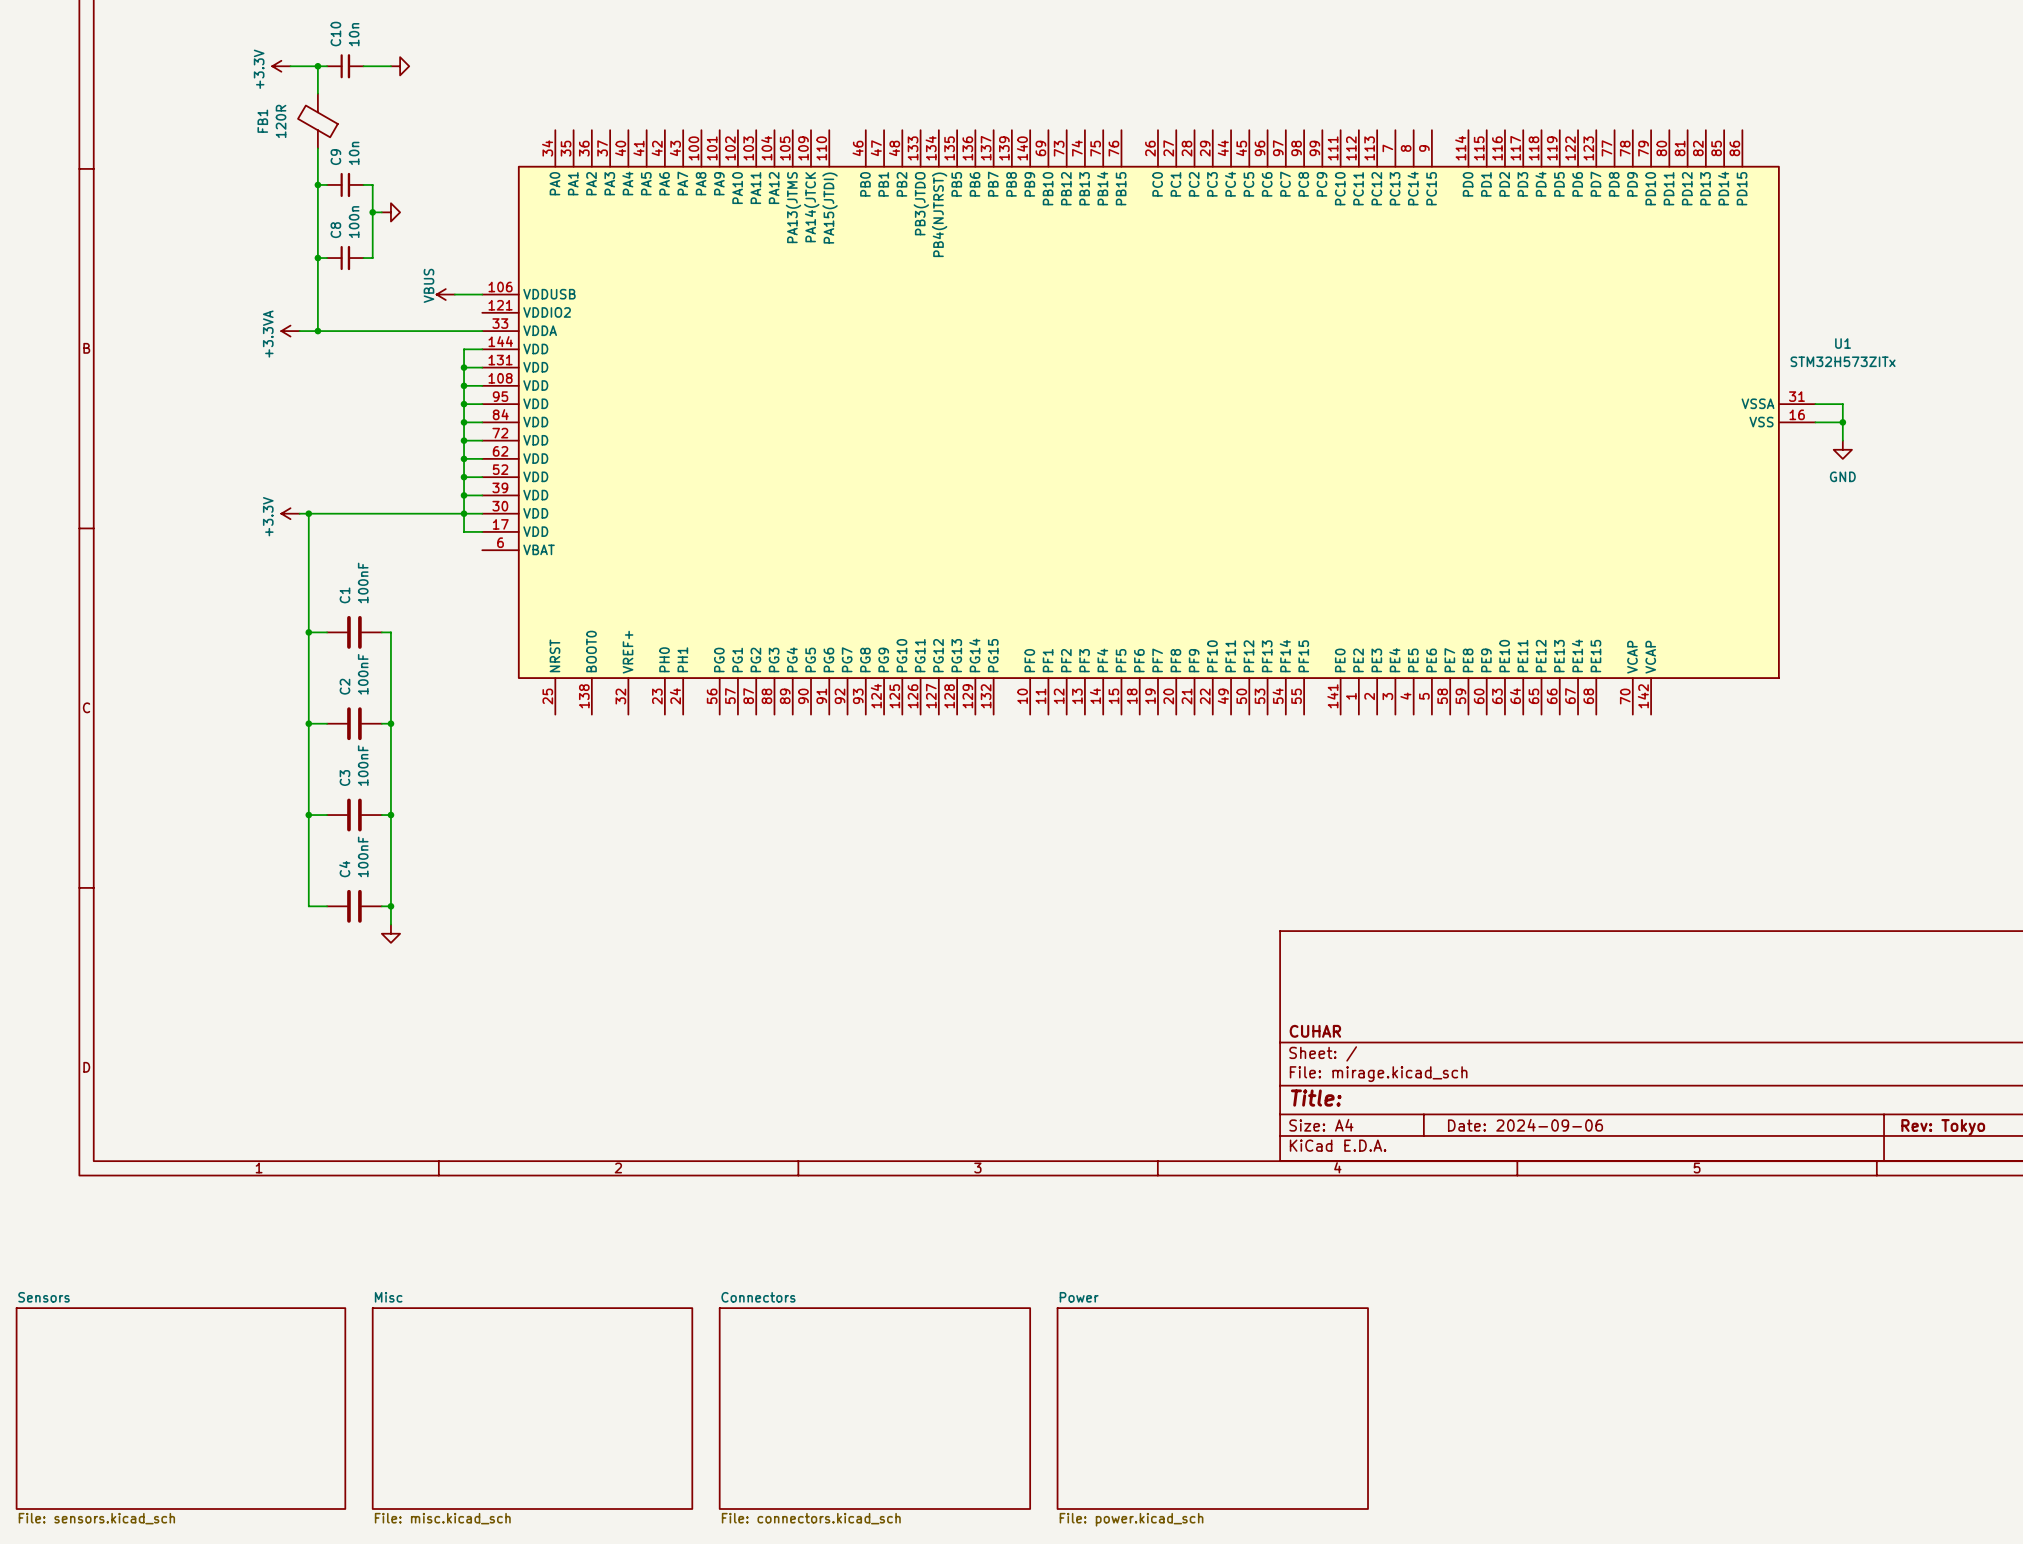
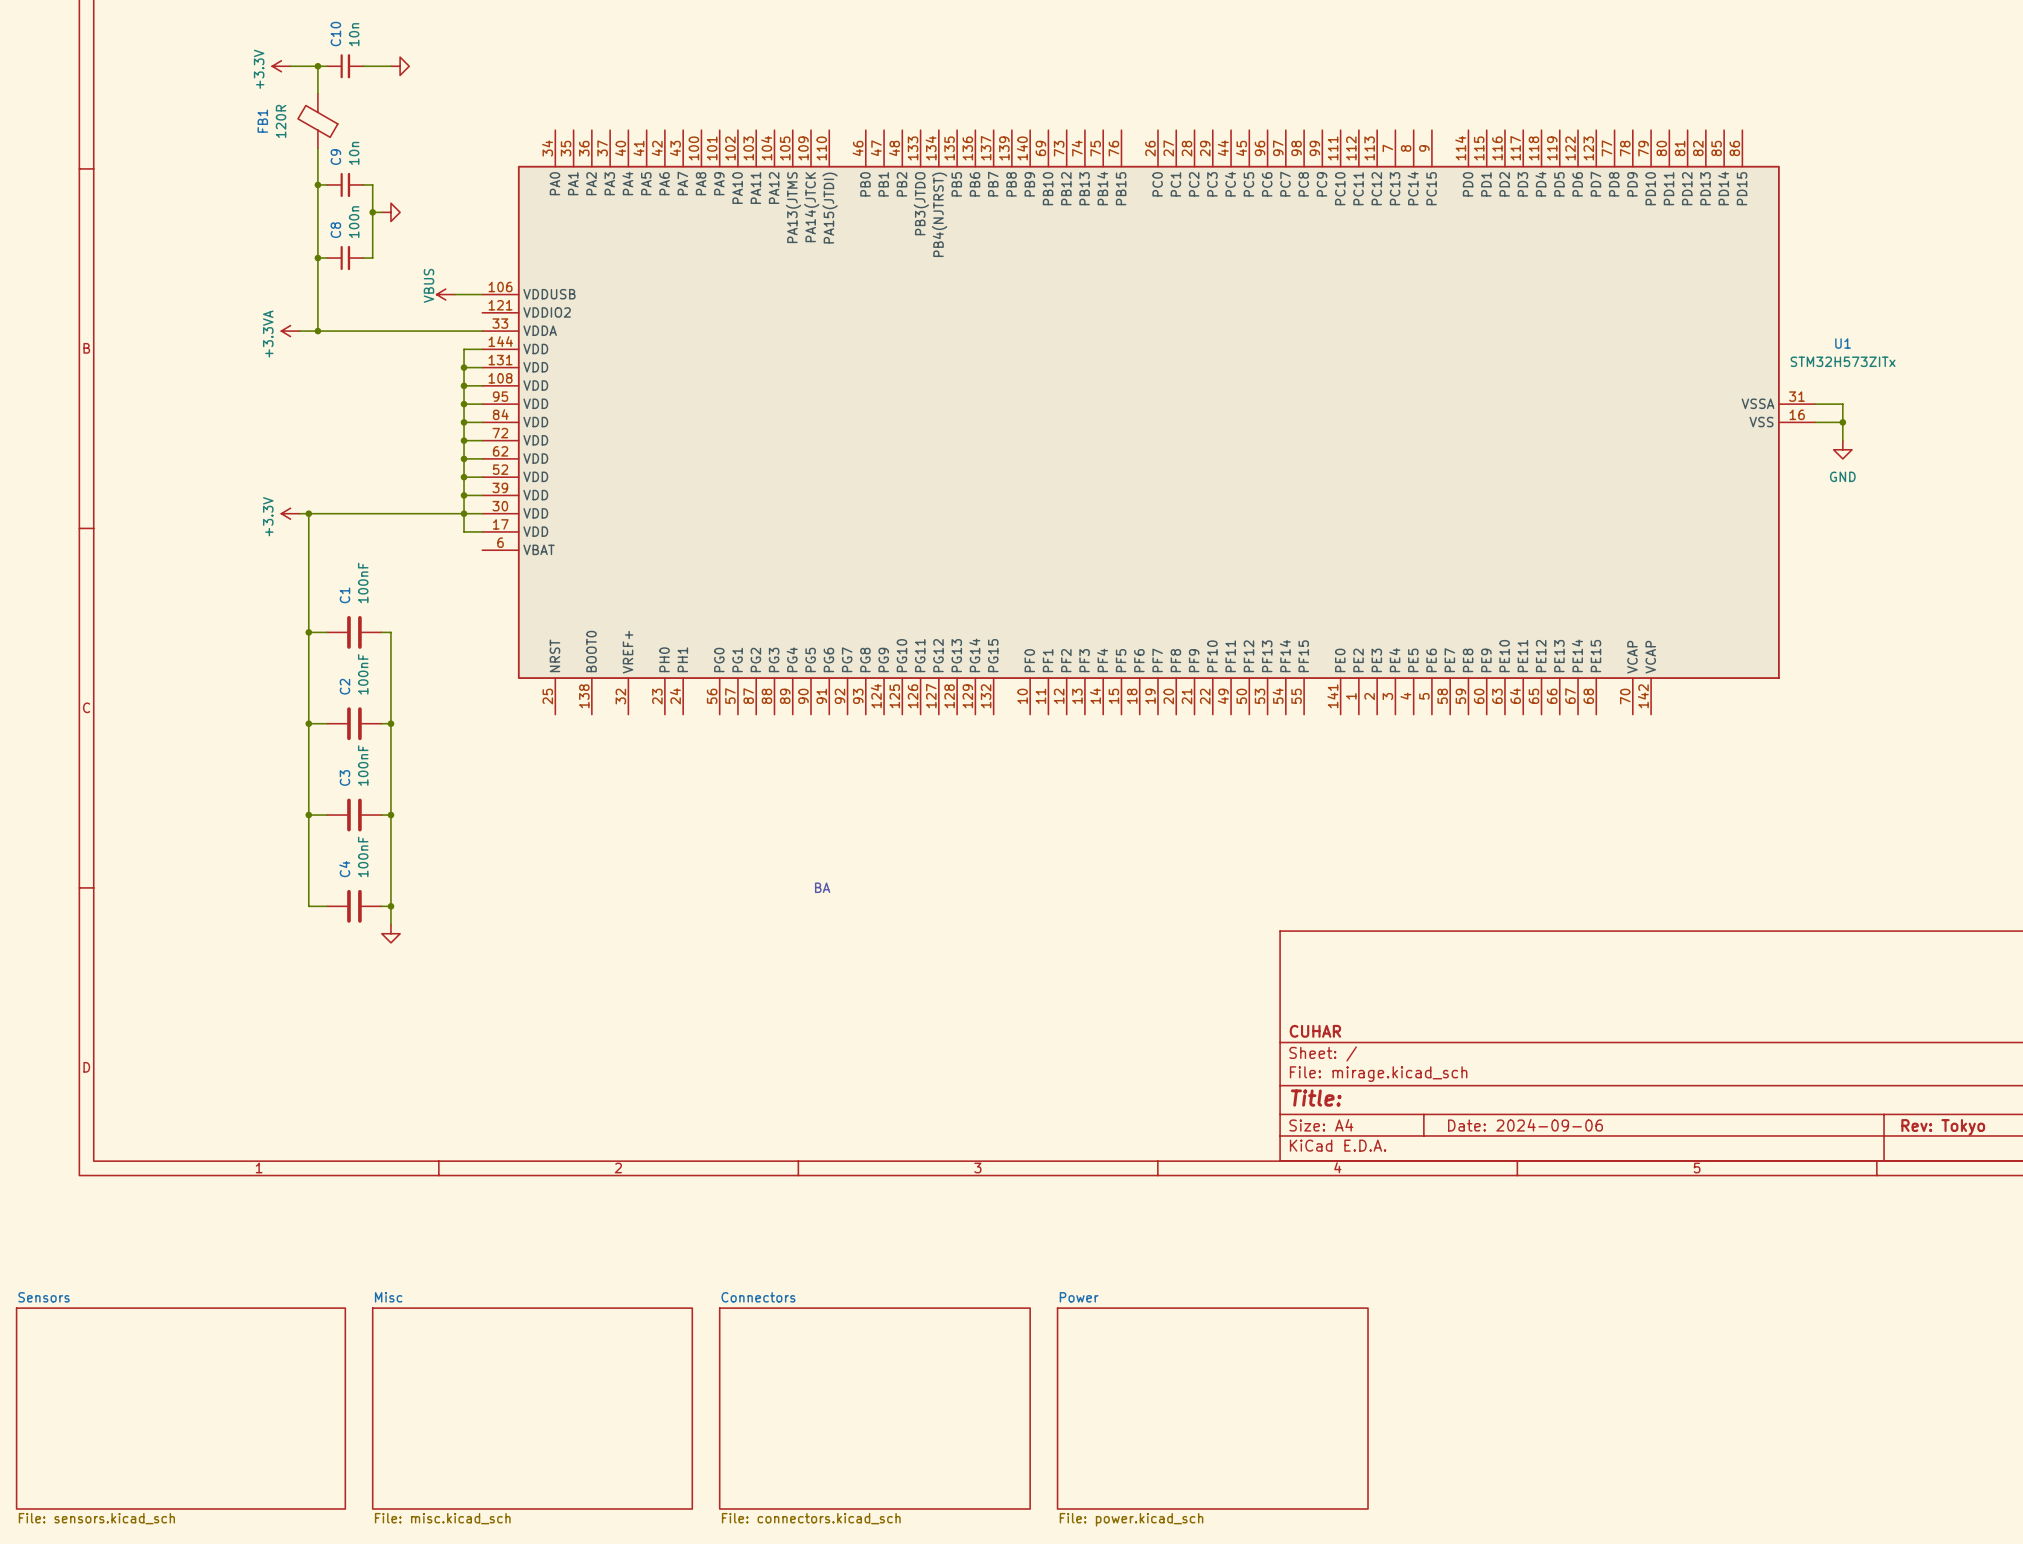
text: none -> BA (822, 887)

